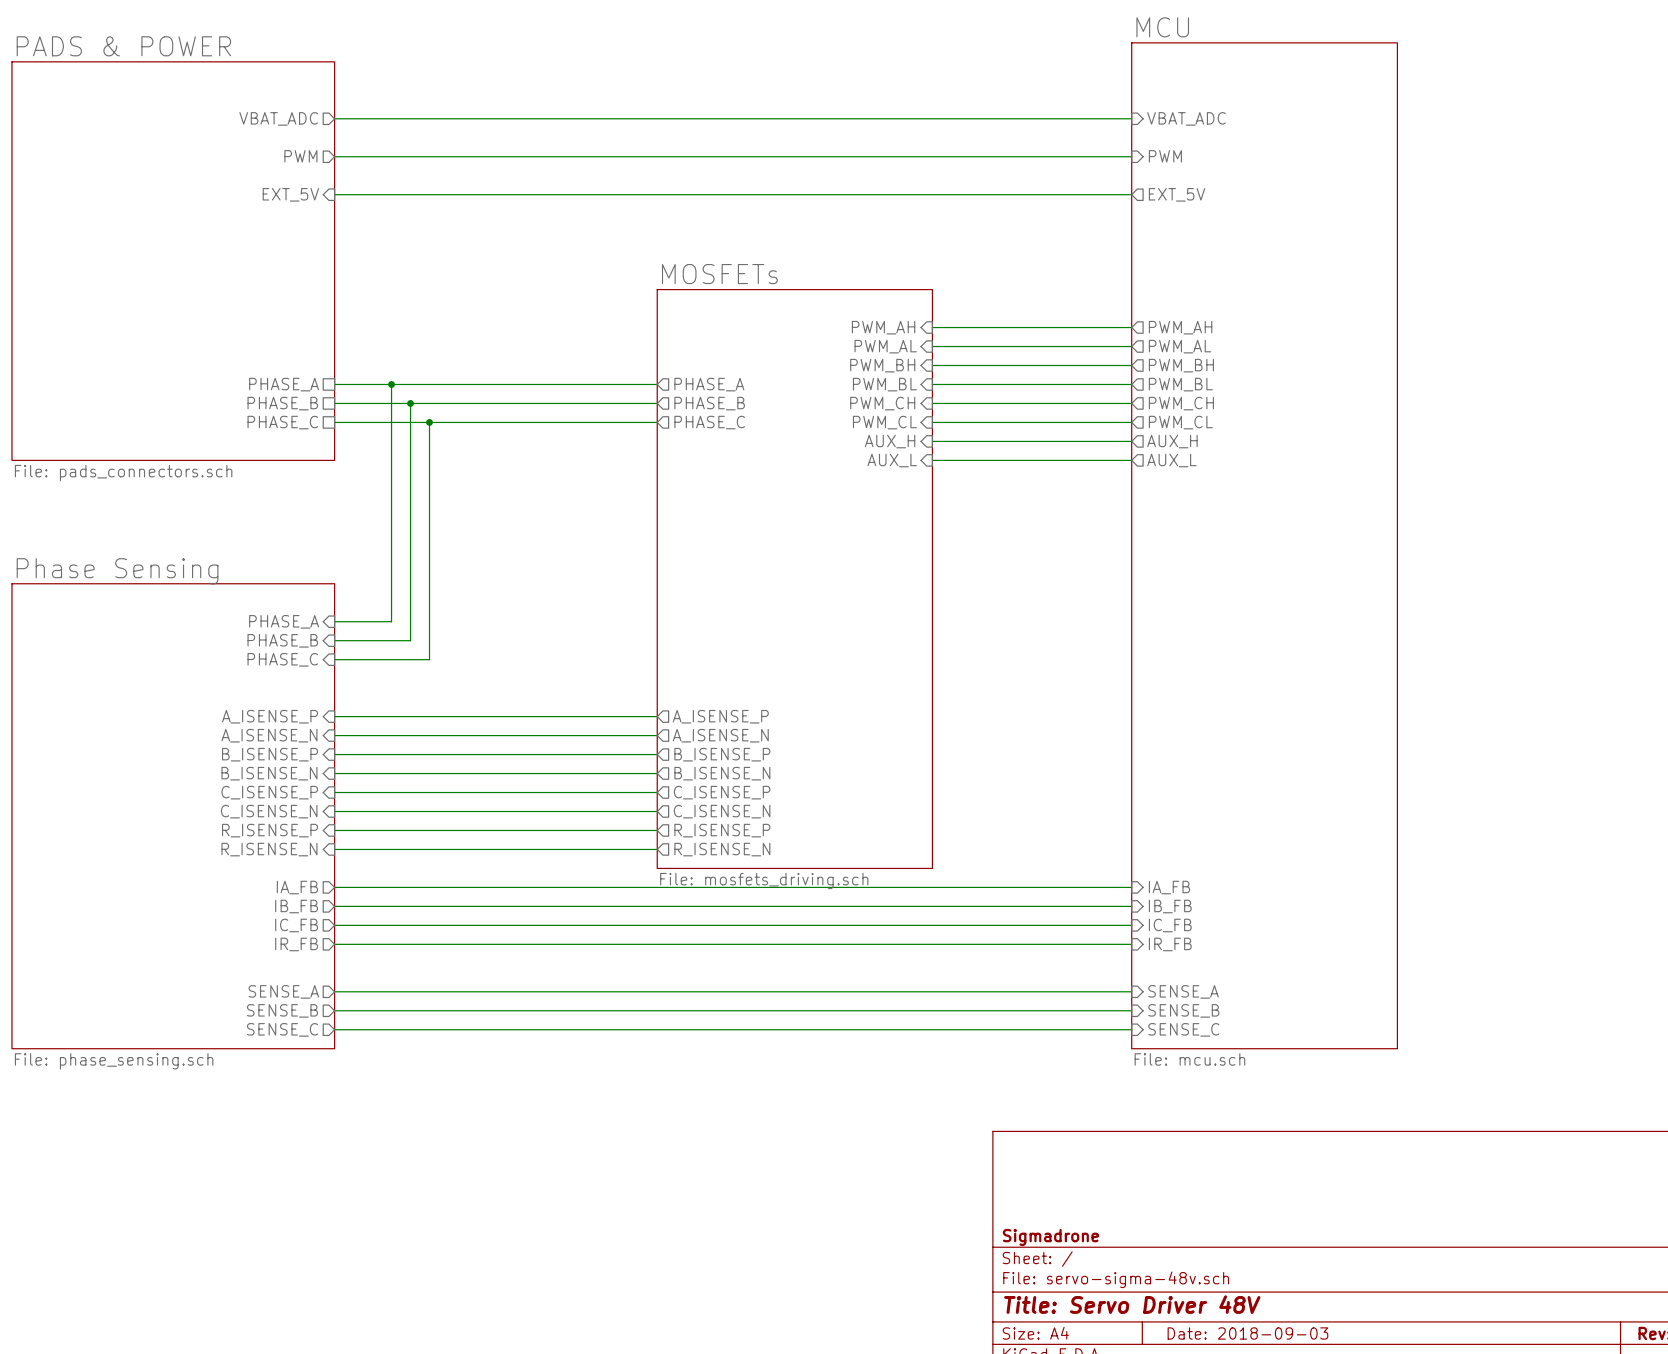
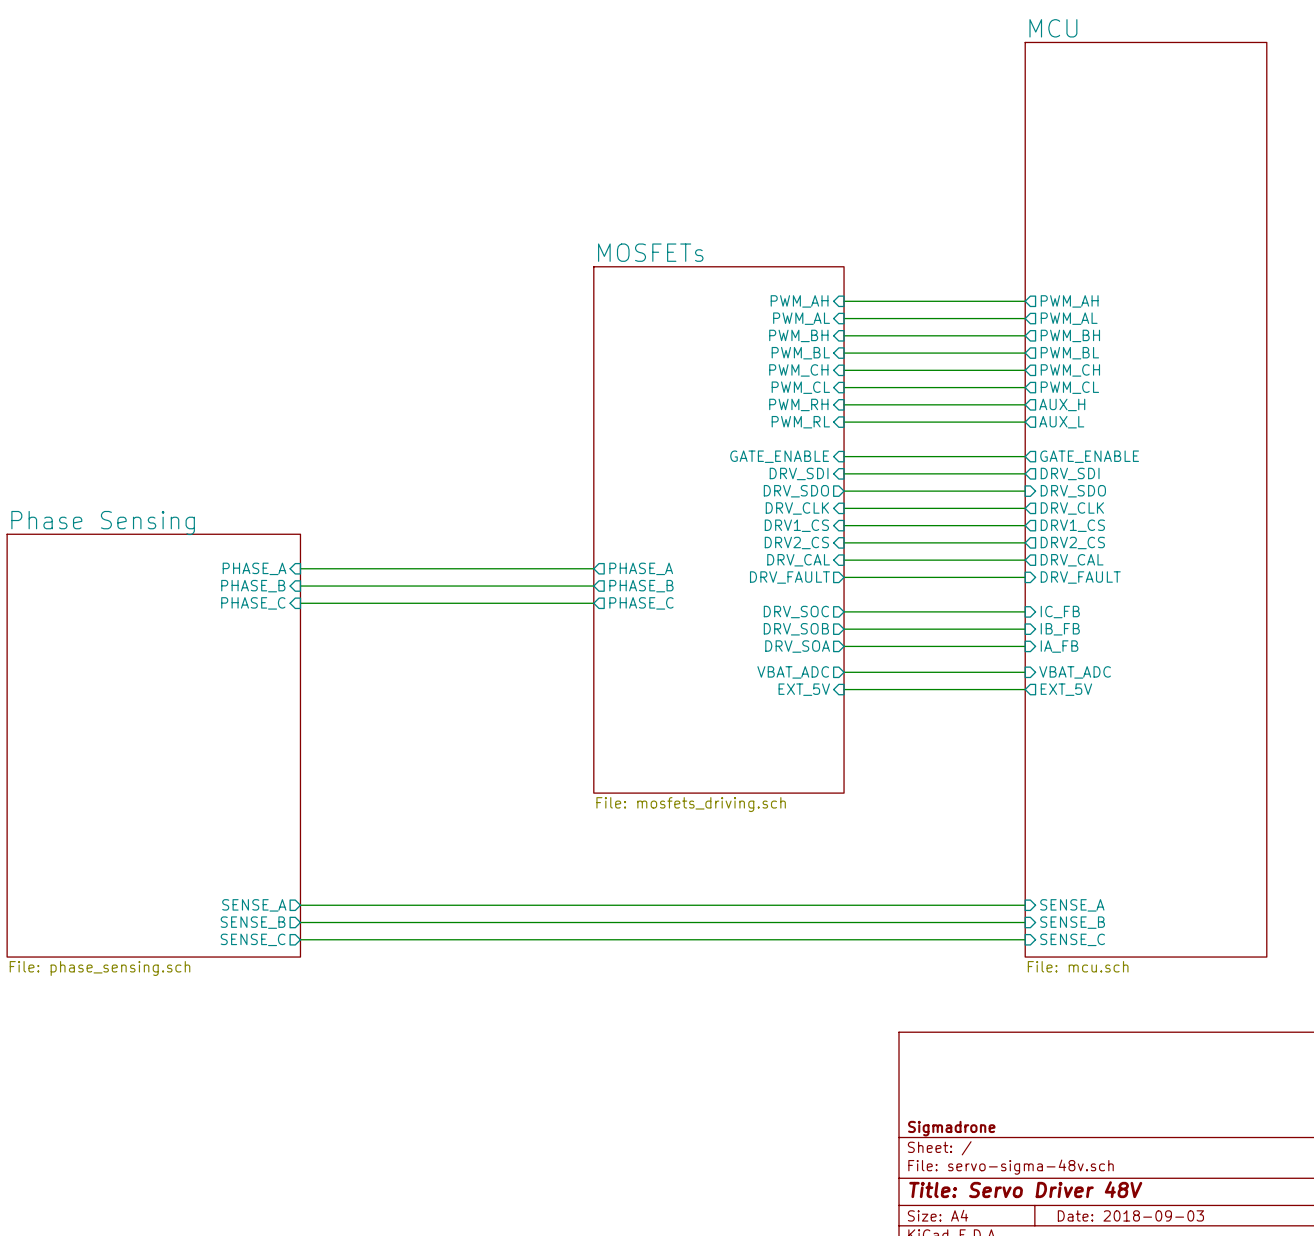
sheet pin: VBAT_ADC (278, 118) -> none
wire: (334, 118) (1131, 118) -> none
sheet pin: VBAT_ADC (1186, 118) -> none
sheet pin: PWM (300, 156) -> none
wire: (334, 156) (1131, 156) -> none
sheet pin: PWM (1165, 156) -> none
sheet pin: EXT_5V (290, 194) -> none
wire: (334, 194) (1131, 194) -> none
sheet pin: EXT_5V (1177, 194) -> none
sheet PADS & POWER: File: pads_connectors.sch (173, 261) -> none
sheet pin: PHASE_A (284, 384) -> none
wire: (334, 384) (657, 384) -> none
wire: (391, 384) (391, 621) -> (593, 568) (352, 568)
junction: (391, 384) -> none
sheet pin: PHASE_A (709, 384) -> none
sheet pin: PHASE_B (282, 403) -> none
wire: (334, 403) (657, 403) -> none
wire: (410, 403) (410, 640) -> (593, 586) (369, 586)
junction: (410, 403) -> none
sheet pin: PHASE_B (709, 403) -> none
sheet pin: PHASE_C (282, 422) -> none
wire: (334, 422) (657, 422) -> none
wire: (429, 422) (429, 659) -> (593, 603) (386, 603)
junction: (429, 422) -> none
sheet pin: PHASE_C (709, 422) -> none
sheet pin: AUX_H (890, 441) -> PWM_RH (798, 404)
sheet pin: AUX_L (892, 460) -> PWM_RL (800, 422)
sheet pin: none -> GATE_ENABLE (779, 456)
wire: none -> (844, 456) (1025, 456)
sheet pin: none -> GATE_ENABLE (1089, 456)
sheet pin: none -> DRV_SDI (799, 473)
wire: none -> (844, 473) (1025, 473)
sheet pin: none -> DRV_SDI (1070, 473)
sheet pin: none -> DRV_SDO (796, 491)
wire: none -> (844, 491) (1025, 491)
sheet pin: none -> DRV_SDO (1073, 491)
sheet pin: none -> DRV_CLK (797, 508)
wire: none -> (844, 508) (1025, 508)
sheet pin: none -> DRV_CLK (1072, 508)
sheet pin: none -> DRV1_CS (796, 525)
wire: none -> (844, 525) (1025, 525)
sheet pin: none -> DRV1_CS (1072, 525)
sheet pin: none -> DRV2_CS (796, 542)
wire: none -> (844, 542) (1025, 542)
sheet pin: none -> DRV2_CS (1072, 542)
sheet pin: none -> DRV_CAL (798, 560)
wire: none -> (844, 560) (1025, 560)
sheet pin: none -> DRV_CAL (1072, 560)
sheet pin: none -> PHASE_A (641, 568)
sheet pin: none -> DRV_FAULT (789, 577)
wire: none -> (844, 577) (1025, 577)
sheet pin: none -> DRV_FAULT (1080, 577)
sheet pin: none -> PHASE_B (641, 586)
sheet pin: none -> PHASE_C (641, 603)
sheet pin: none -> DRV_SOC (796, 612)
wire: none -> (844, 611) (1025, 611)
sheet pin: none -> IC_FB (1060, 612)
sheet pin: none -> DRV_SOB (796, 629)
wire: none -> (844, 629) (1025, 629)
sheet pin: none -> IB_FB (1060, 629)
sheet pin: none -> DRV_SOA (797, 646)
wire: none -> (844, 646) (1025, 646)
sheet pin: A_ISENSE_P (270, 716) -> none
wire: (334, 716) (657, 716) -> none
sheet pin: A_ISENSE_P (720, 716) -> none
sheet pin: A_ISENSE_N (269, 735) -> none
wire: (334, 735) (657, 735) -> none
sheet pin: A_ISENSE_N (720, 735) -> none
sheet pin: none -> VBAT_ADC (793, 672)
wire: none -> (844, 672) (1025, 672)
sheet pin: none -> VBAT_ADC (1075, 672)
sheet pin: B_ISENSE_P (270, 754) -> none
wire: (334, 754) (657, 754) -> none
sheet pin: B_ISENSE_P (722, 754) -> none
sheet pin: none -> EXT_5V (804, 689)
wire: none -> (844, 689) (1025, 689)
sheet pin: none -> EXT_5V (1066, 689)
sheet pin: B_ISENSE_N (269, 773) -> none
wire: (334, 773) (657, 773) -> none
sheet pin: B_ISENSE_N (722, 773) -> none
sheet pin: C_ISENSE_P (269, 792) -> none
wire: (334, 792) (657, 792) -> none
sheet pin: C_ISENSE_P (722, 792) -> none
sheet pin: C_ISENSE_N (269, 811) -> none
wire: (334, 811) (657, 811) -> none
sheet pin: C_ISENSE_N (722, 811) -> none
sheet pin: R_ISENSE_P (270, 830) -> none
wire: (334, 830) (657, 830) -> none
sheet pin: R_ISENSE_P (722, 830) -> none
sheet pin: R_ISENSE_N (269, 849) -> none
wire: (334, 849) (657, 849) -> none
sheet pin: R_ISENSE_N (722, 849) -> none
sheet pin: IA_FB (297, 887) -> none
wire: (334, 887) (1131, 887) -> none
sheet pin position: IA_FB (1169, 887) -> IA_FB (1059, 646)
sheet pin: IB_FB (296, 906) -> none
wire: (334, 906) (1131, 906) -> none
sheet pin: IB_FB (1170, 906) -> none
sheet pin: IC_FB (296, 925) -> none
wire: (334, 925) (1131, 925) -> none
sheet pin: IC_FB (1170, 925) -> none
sheet pin: IR_FB (296, 944) -> none
wire: (334, 944) (1131, 944) -> none
sheet pin: IR_FB (1170, 944) -> none

